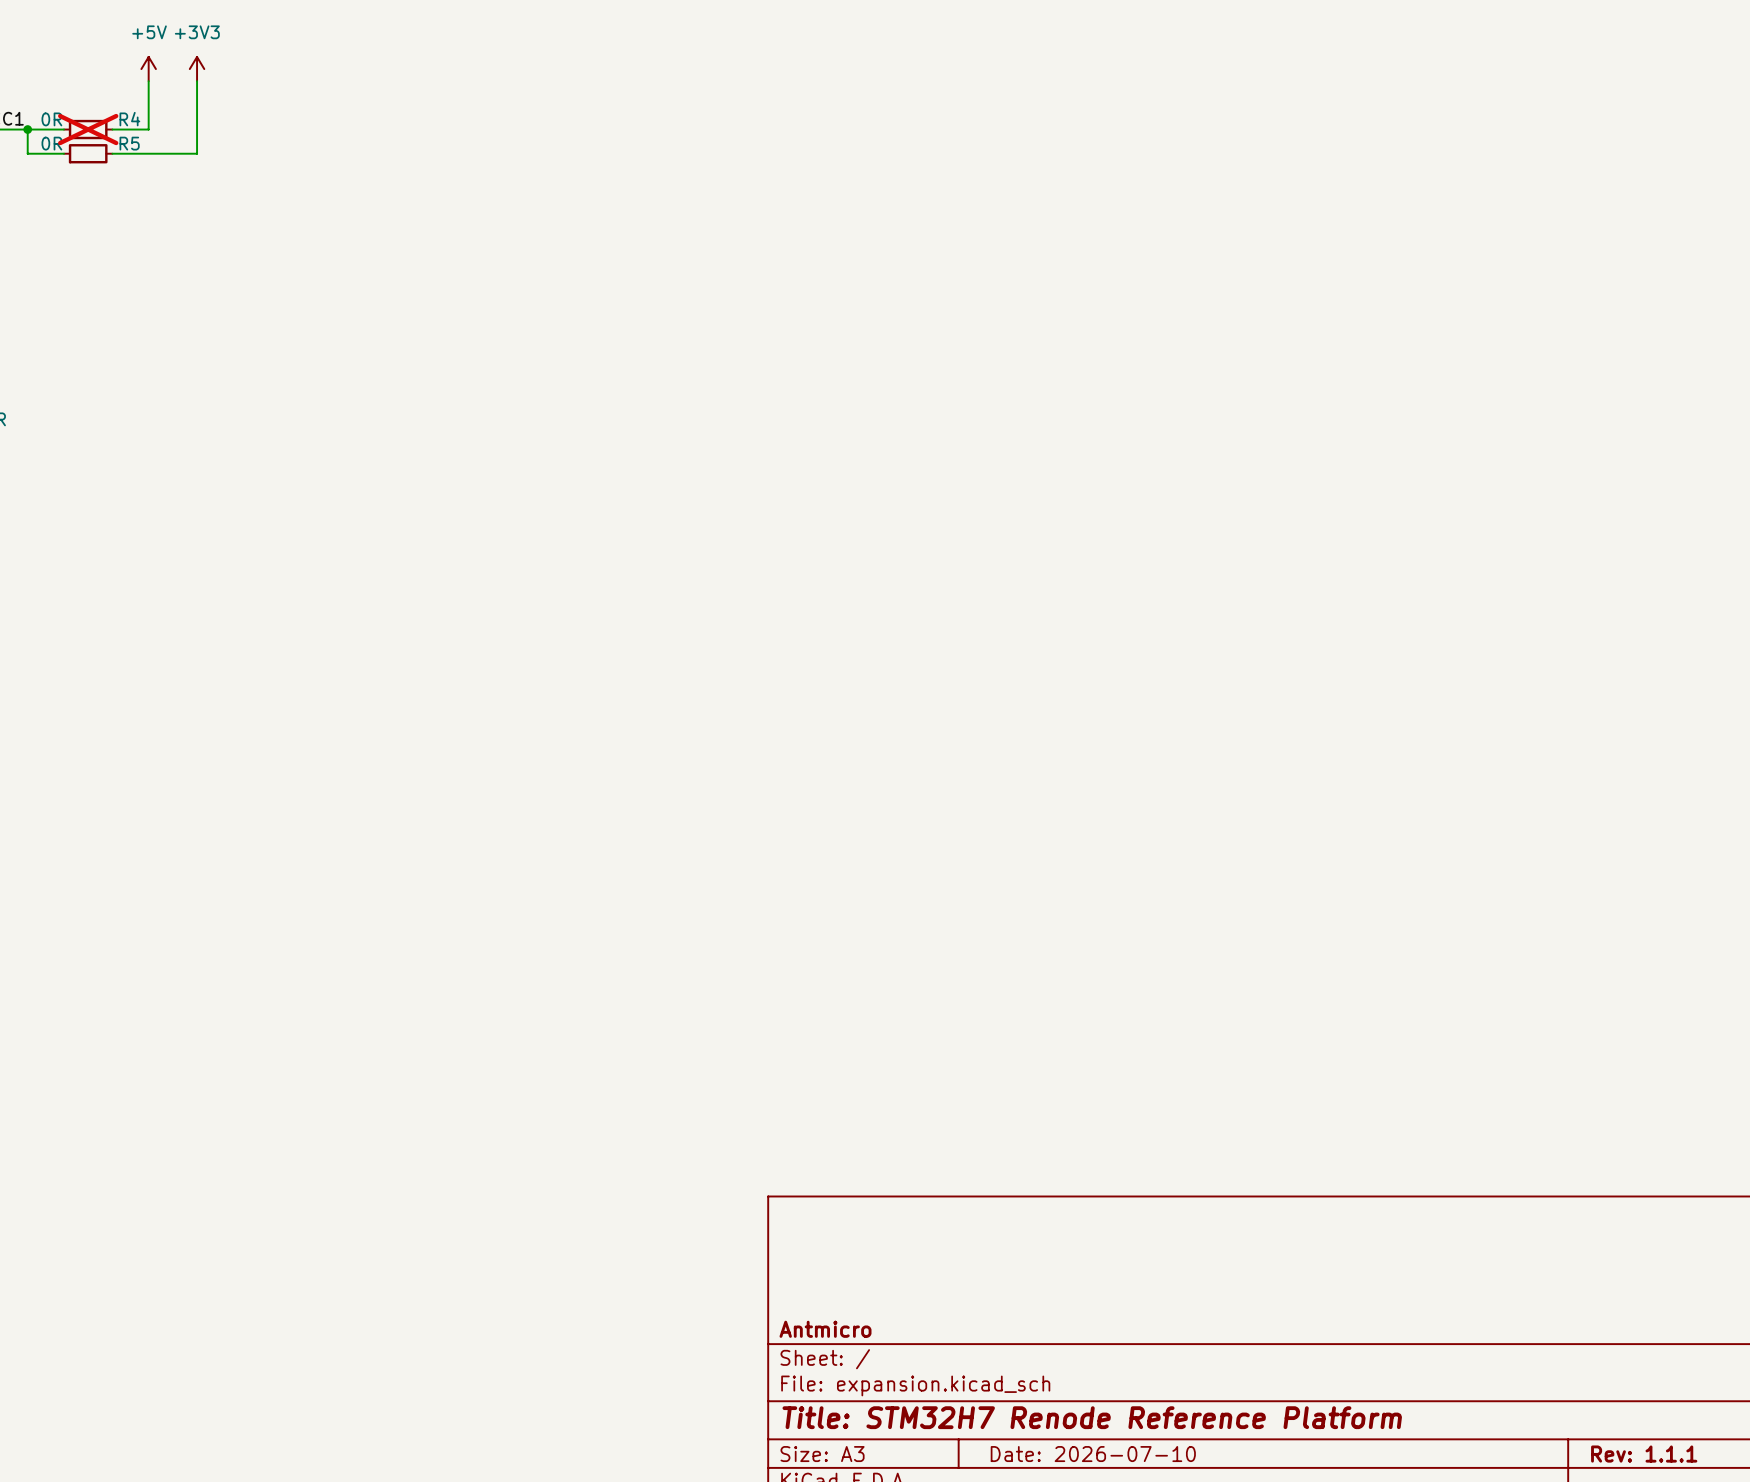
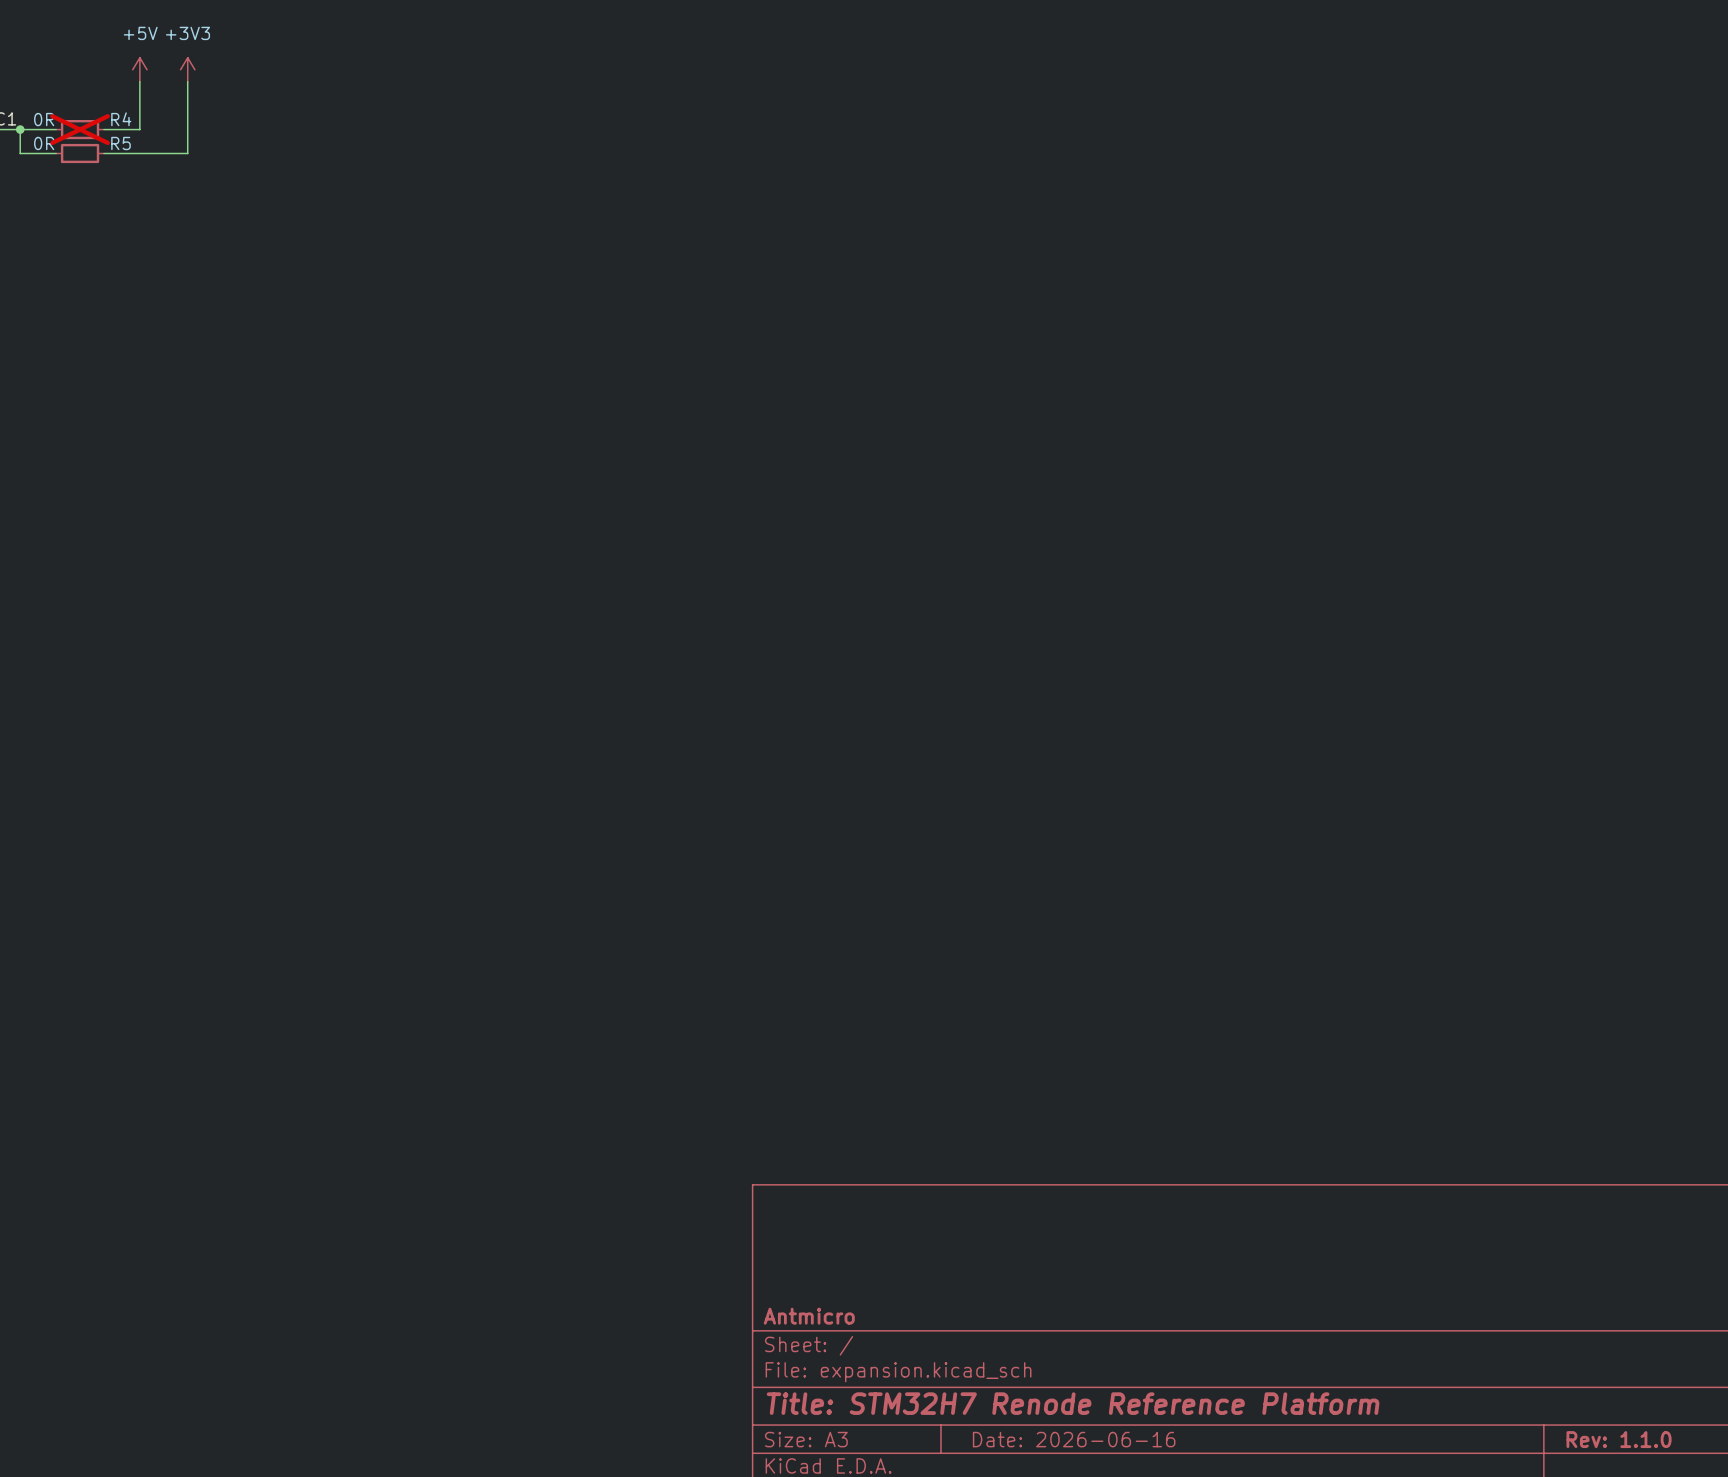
title block: Date: 2026-07-10 (1093, 1454) -> Date: 2026-06-16 (1074, 1439)
title block: Rev: 1.1.1 (1644, 1454) -> Rev: 1.1.0 (1619, 1439)

